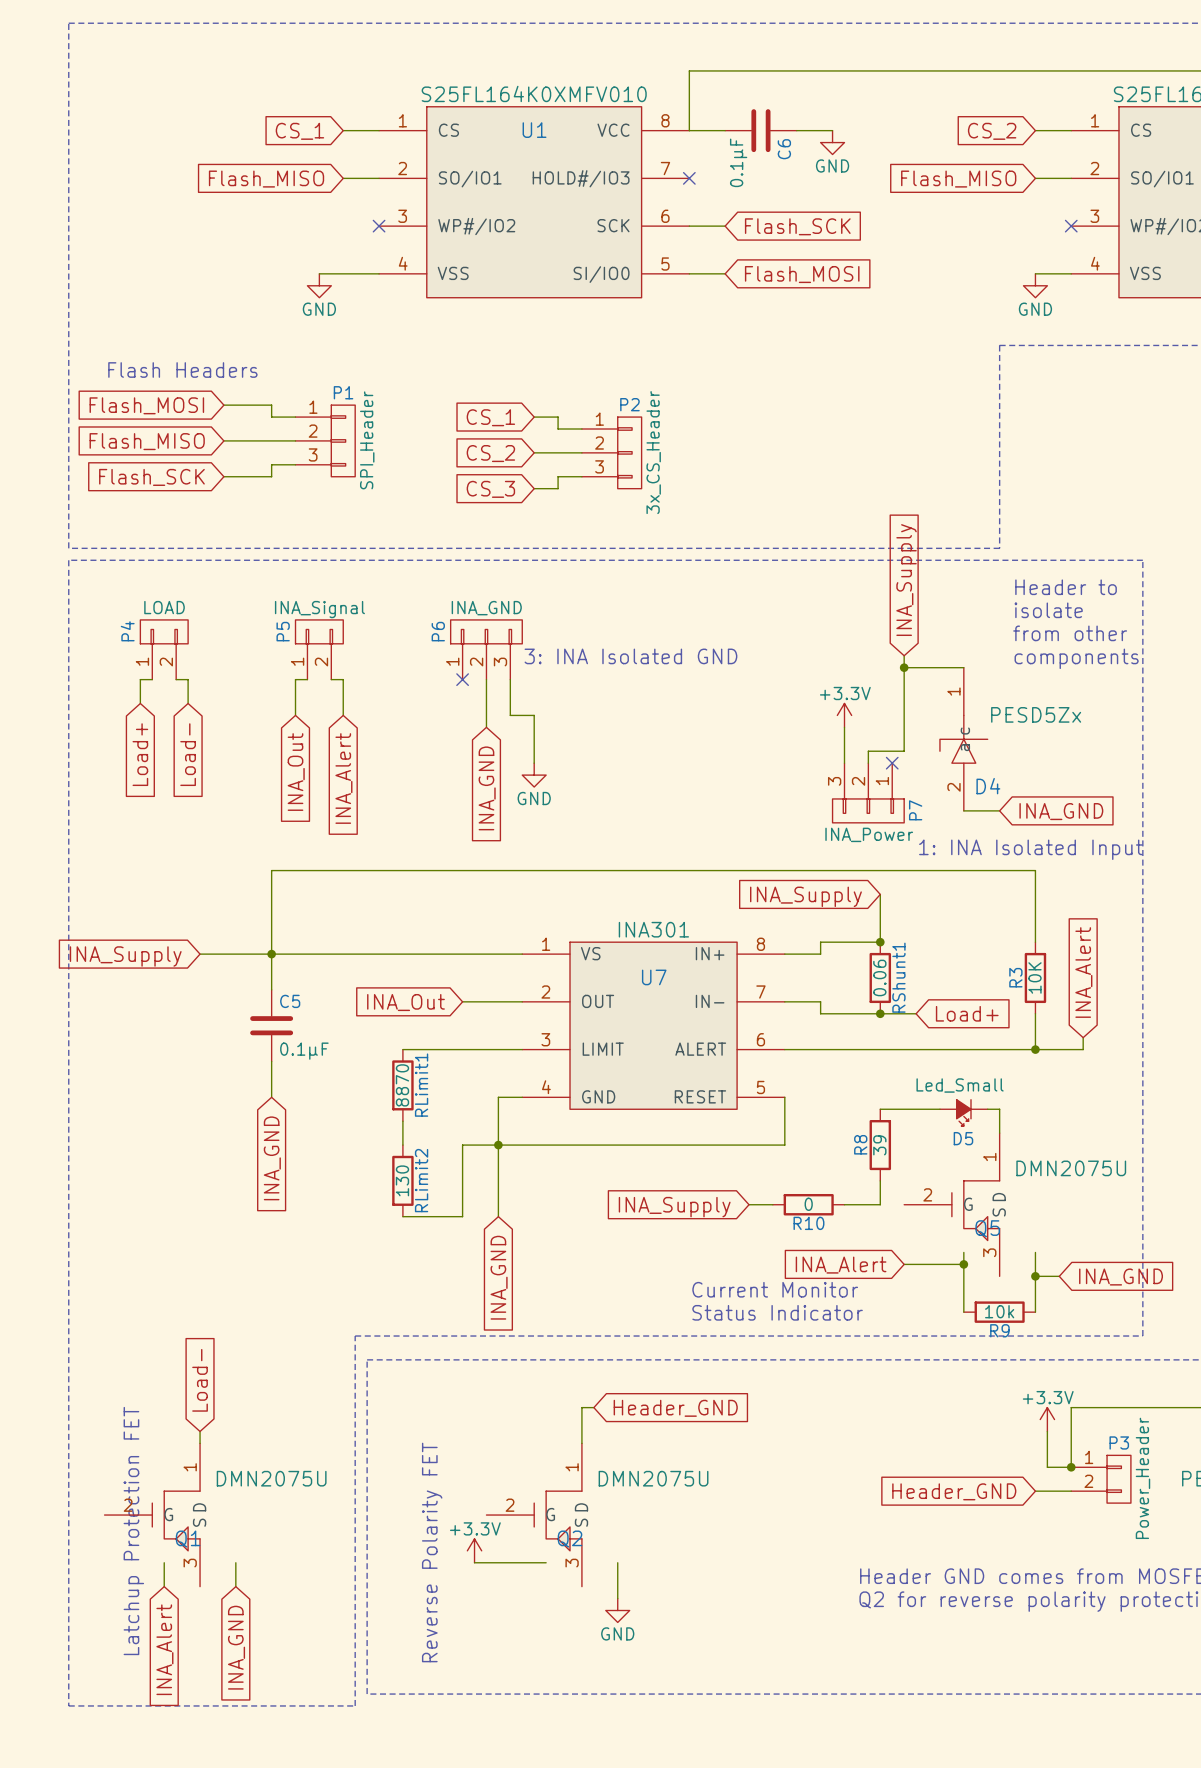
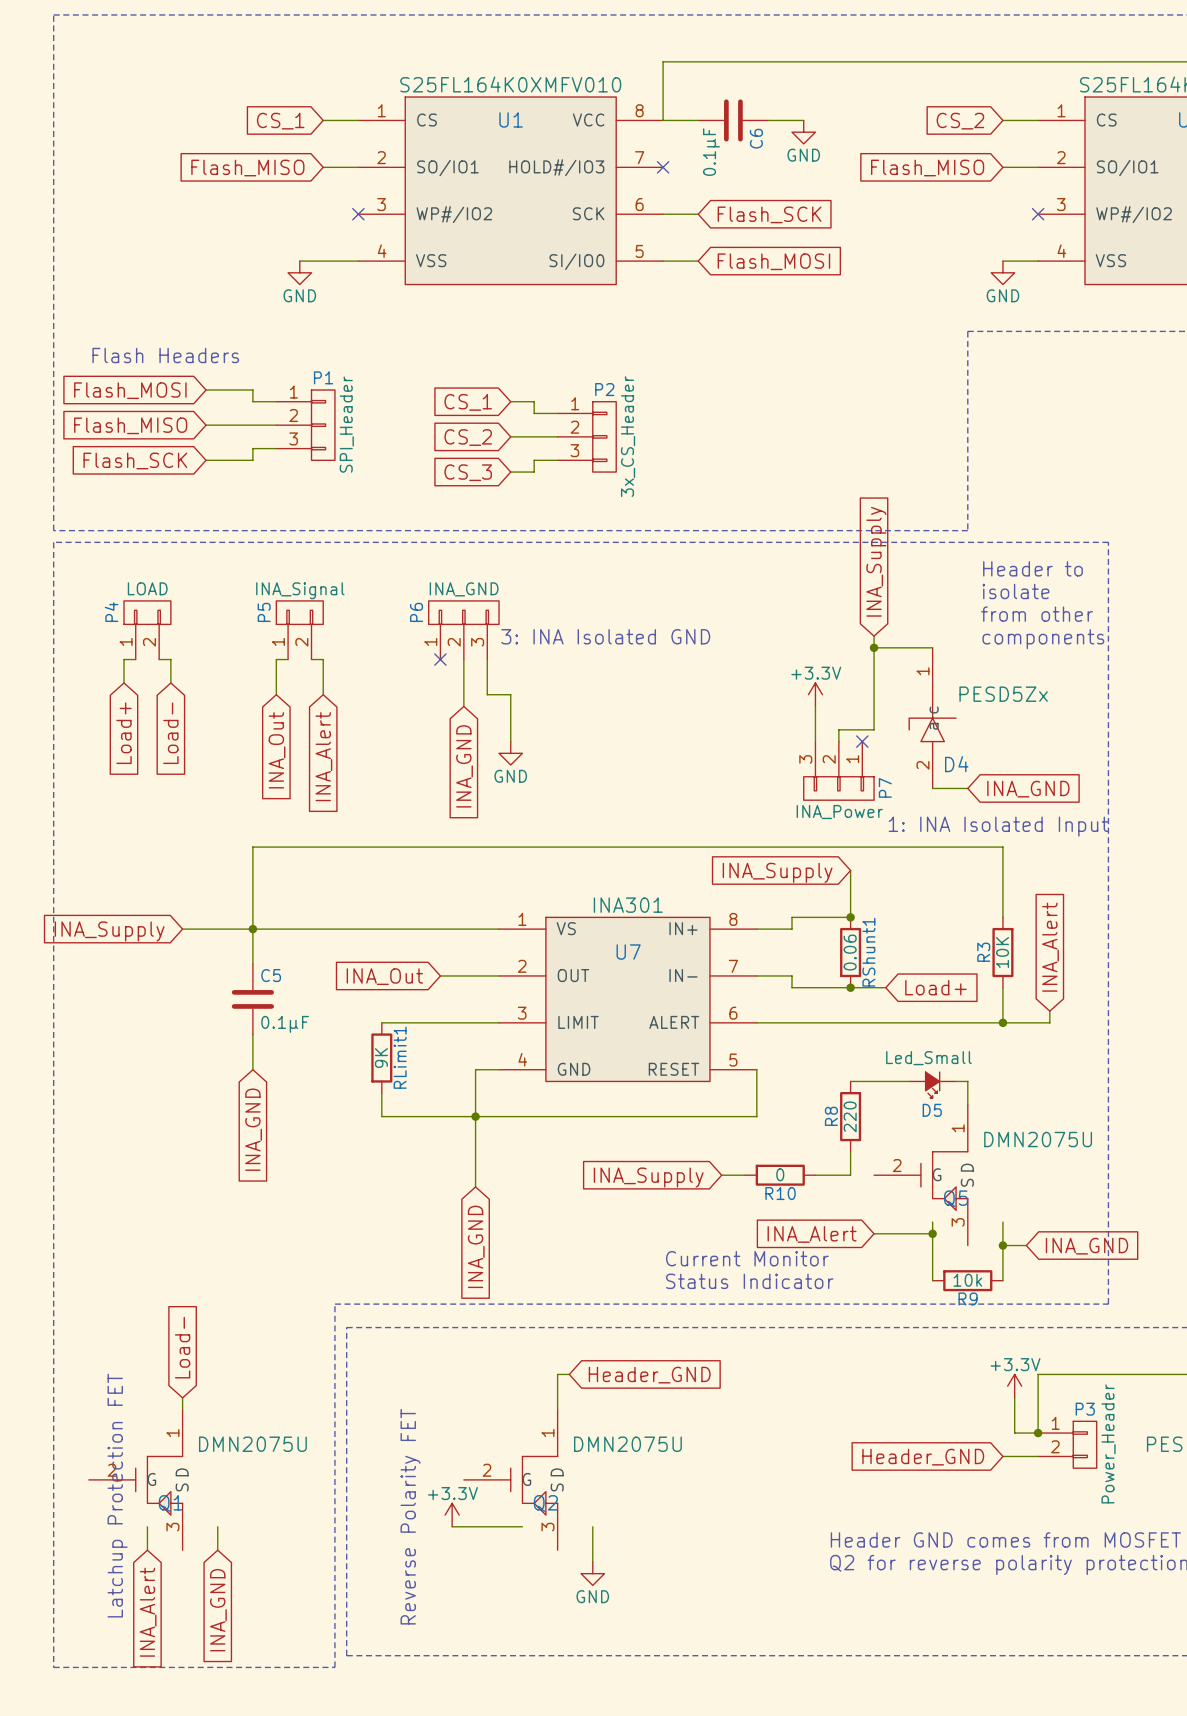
RLimit1 value: 8870 (402, 1085) -> 9K (381, 1058)
wire: (462, 1145) (462, 1216) (402, 1216) -> (440, 1116) (381, 1116)
R8 value: 39 (879, 1145) -> 220 (850, 1116)
RLimit2: 130 (402, 1180) -> none

